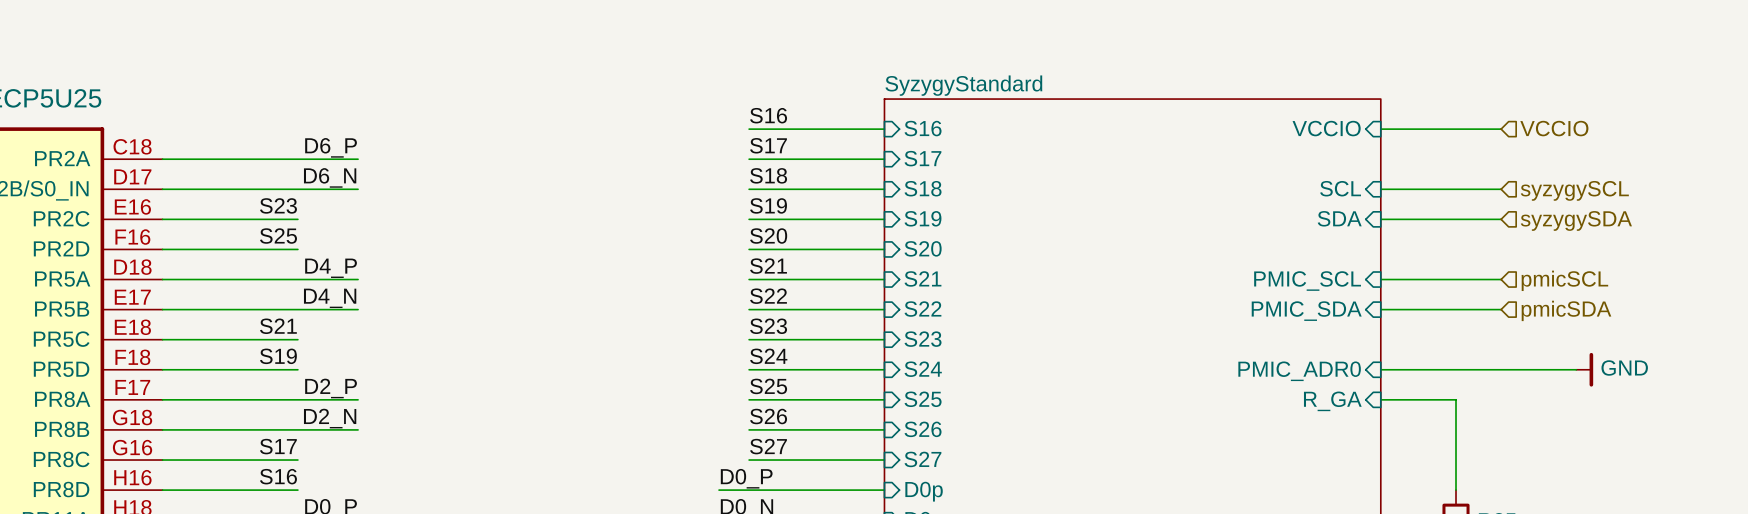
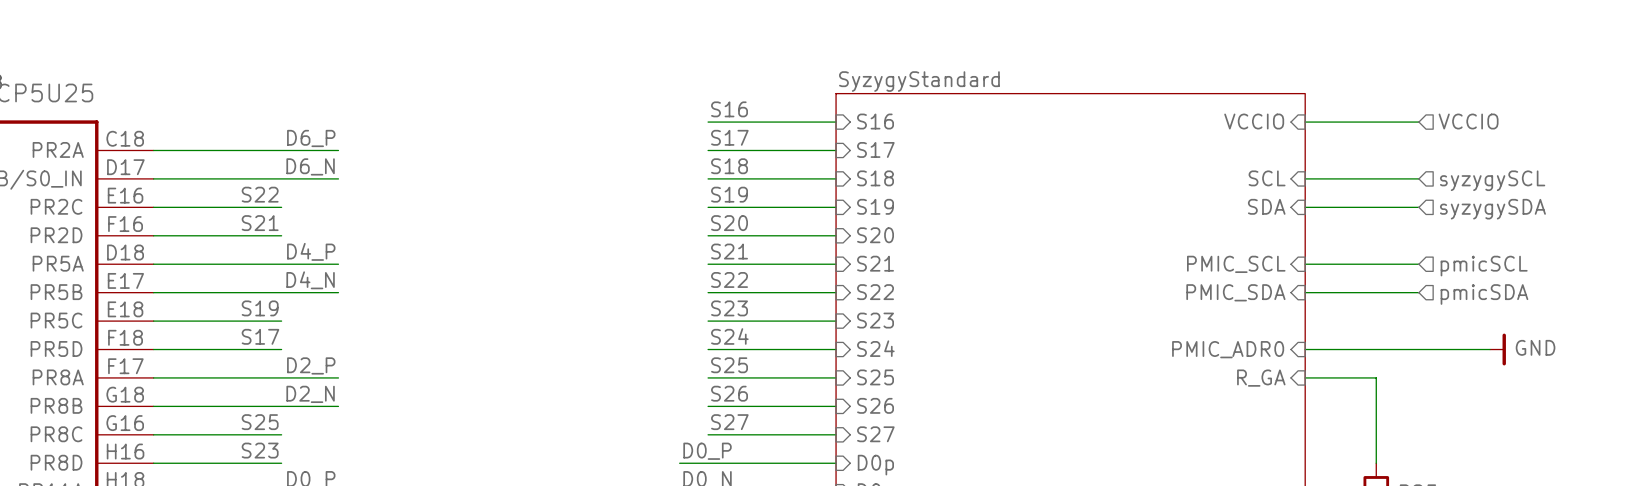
label: S23 (278, 205) -> S22 (260, 194)
label: S25 (278, 236) -> S21 (260, 223)
label: S21 (278, 326) -> S19 (260, 308)
label: S19 (278, 356) -> S17 (260, 336)
label: S17 (278, 446) -> S25 (260, 422)
label: S16 (278, 476) -> S23 (260, 450)

